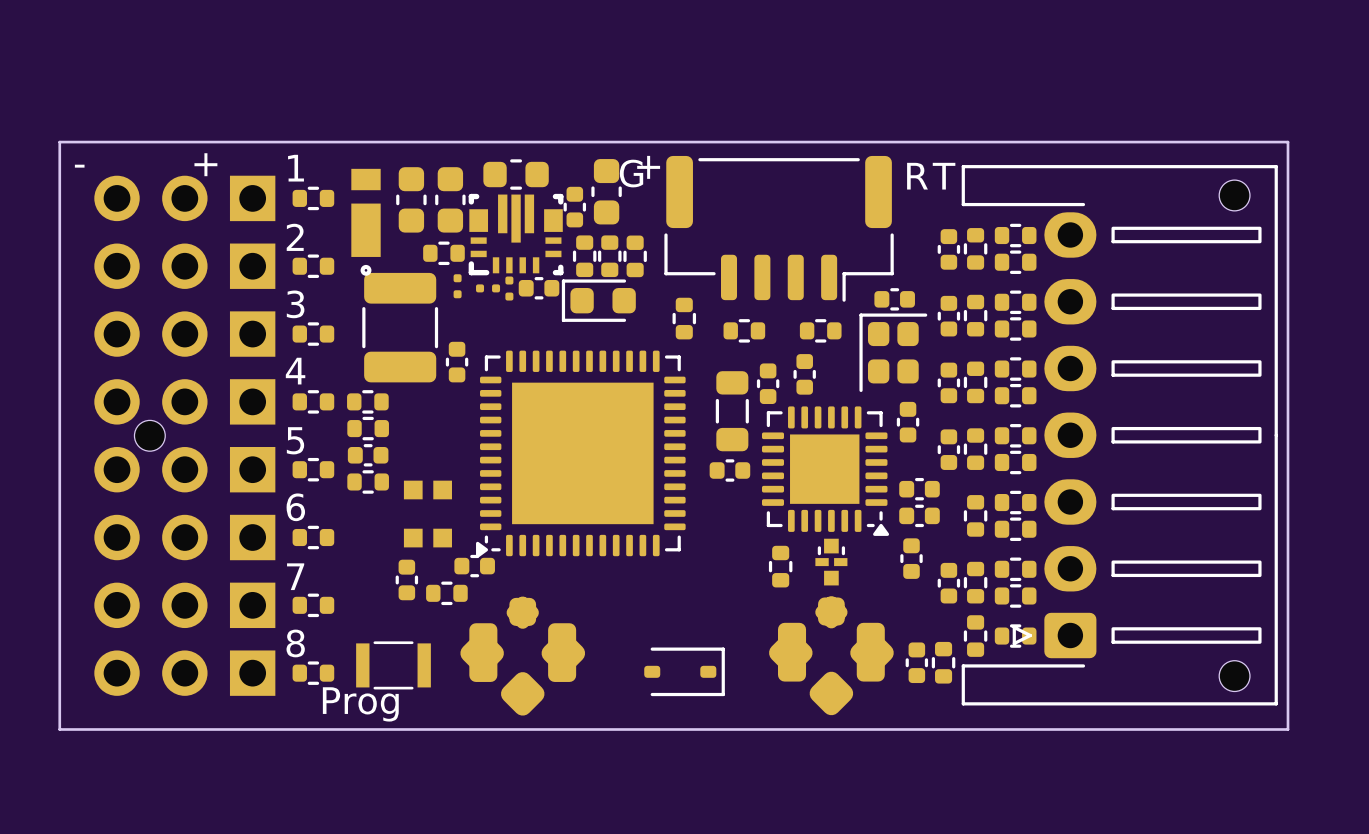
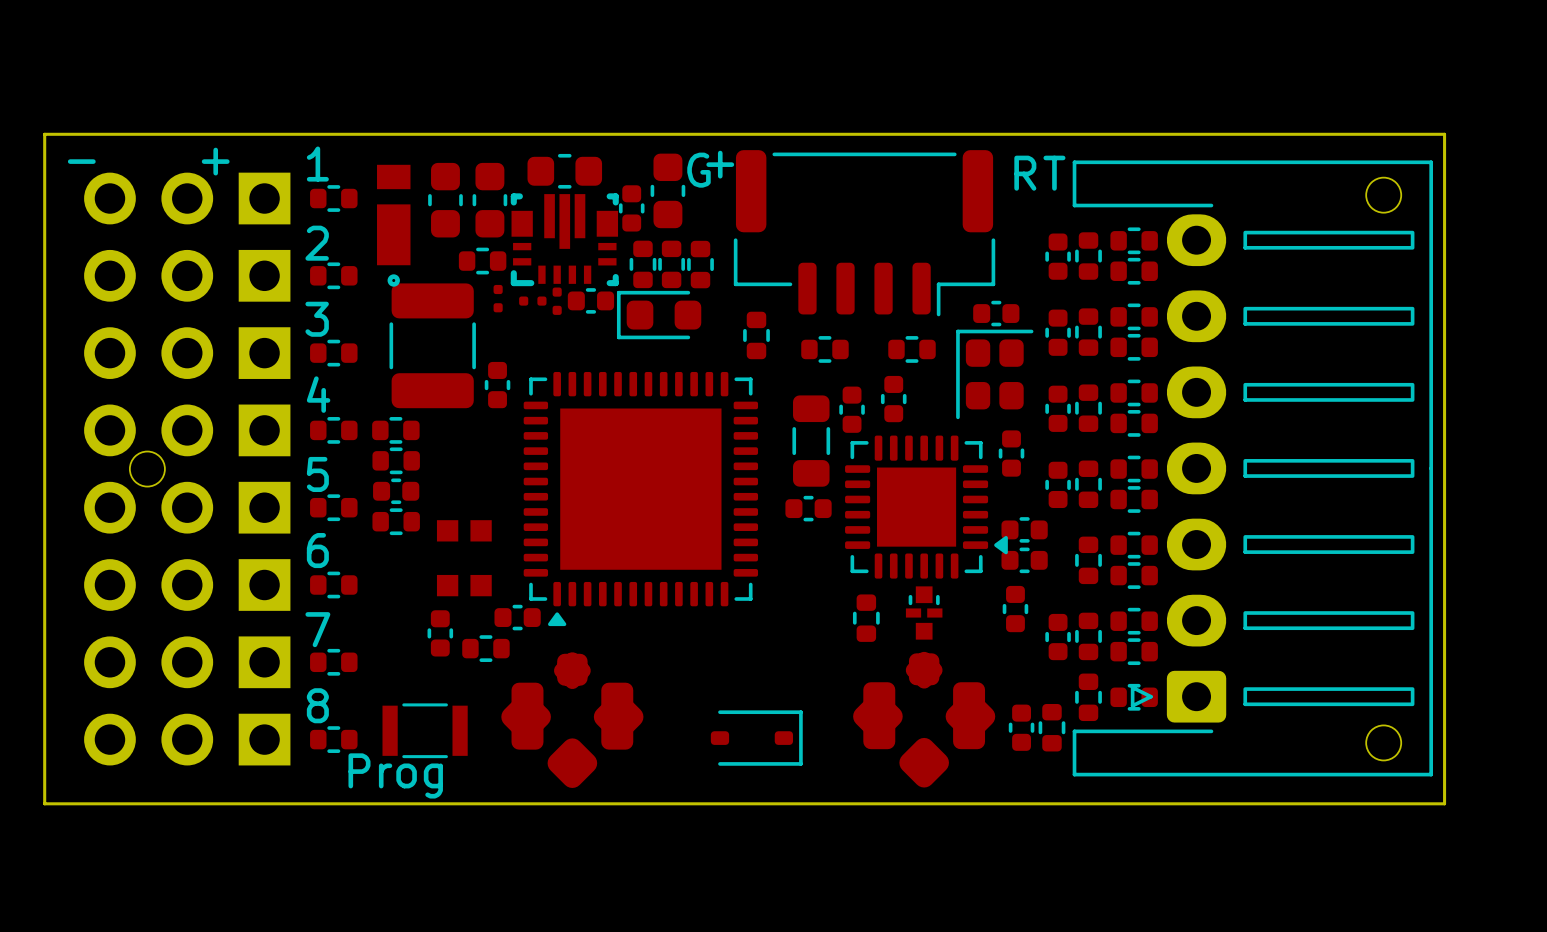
part footprint: [476, 350, 686, 558] -> [523, 371, 759, 627]
part footprint: [761, 406, 890, 536] -> [845, 435, 1008, 579]

